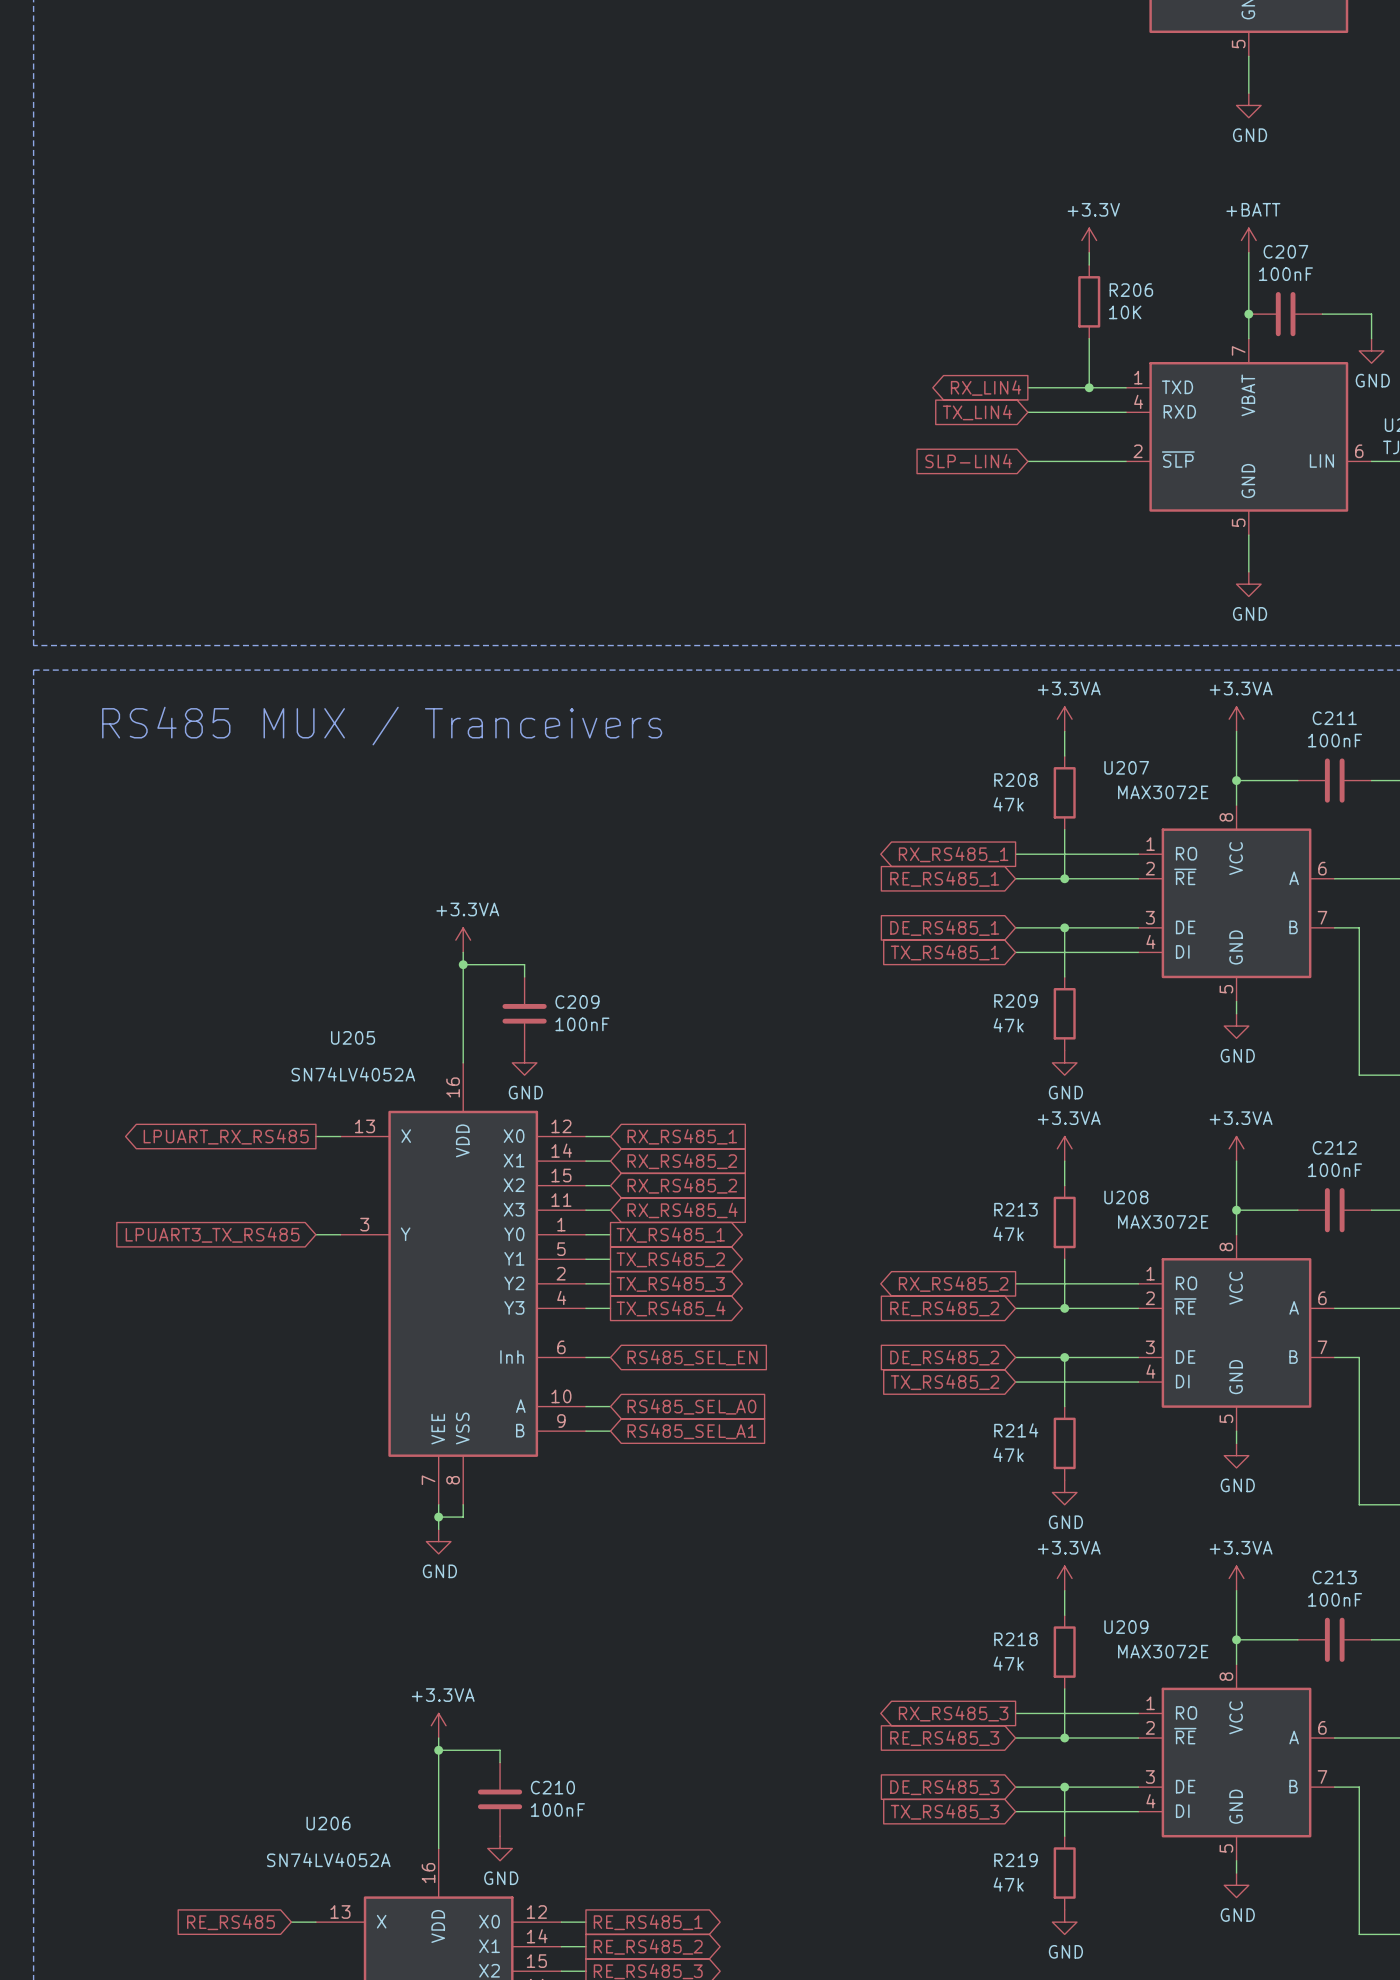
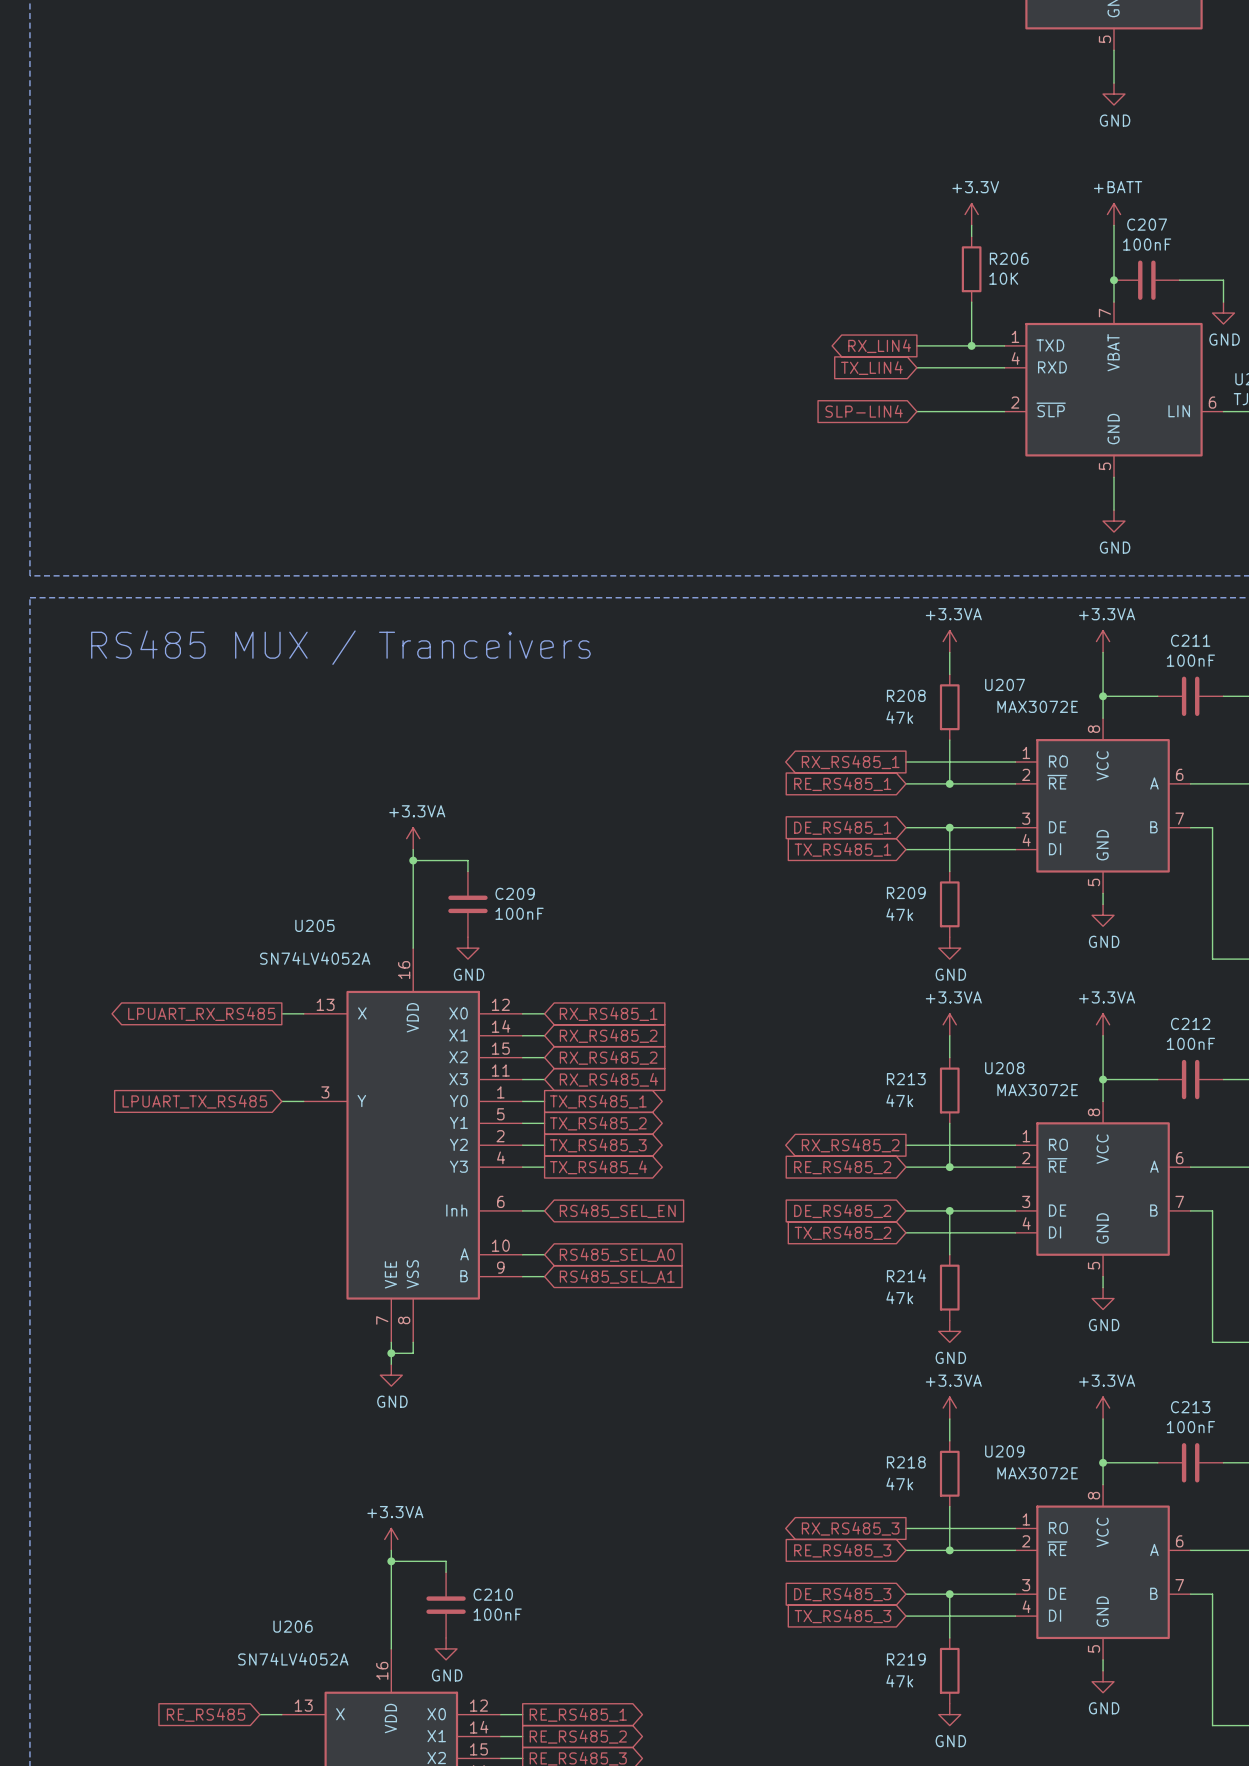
global label: LPUART3_TX_RS485 (212, 1235) -> LPUART_TX_RS485 (194, 1101)

